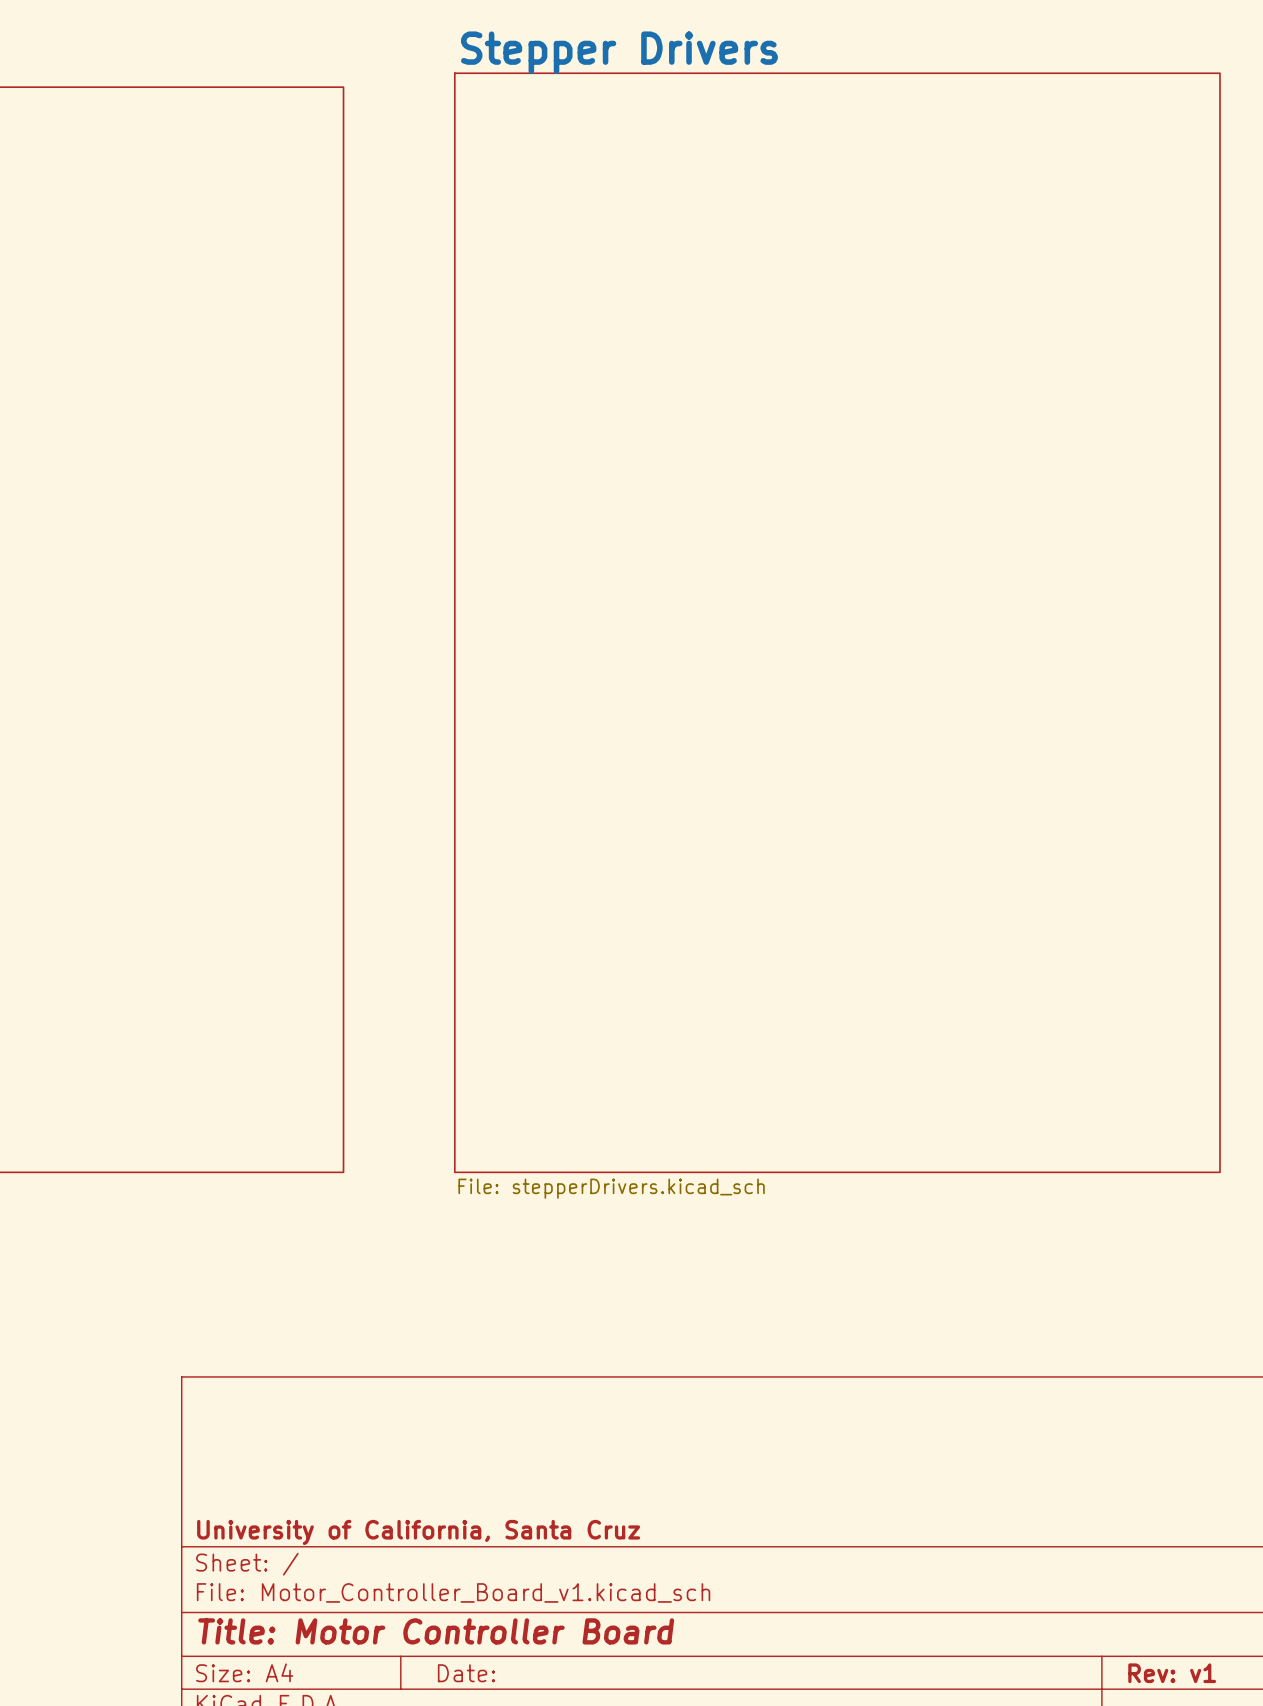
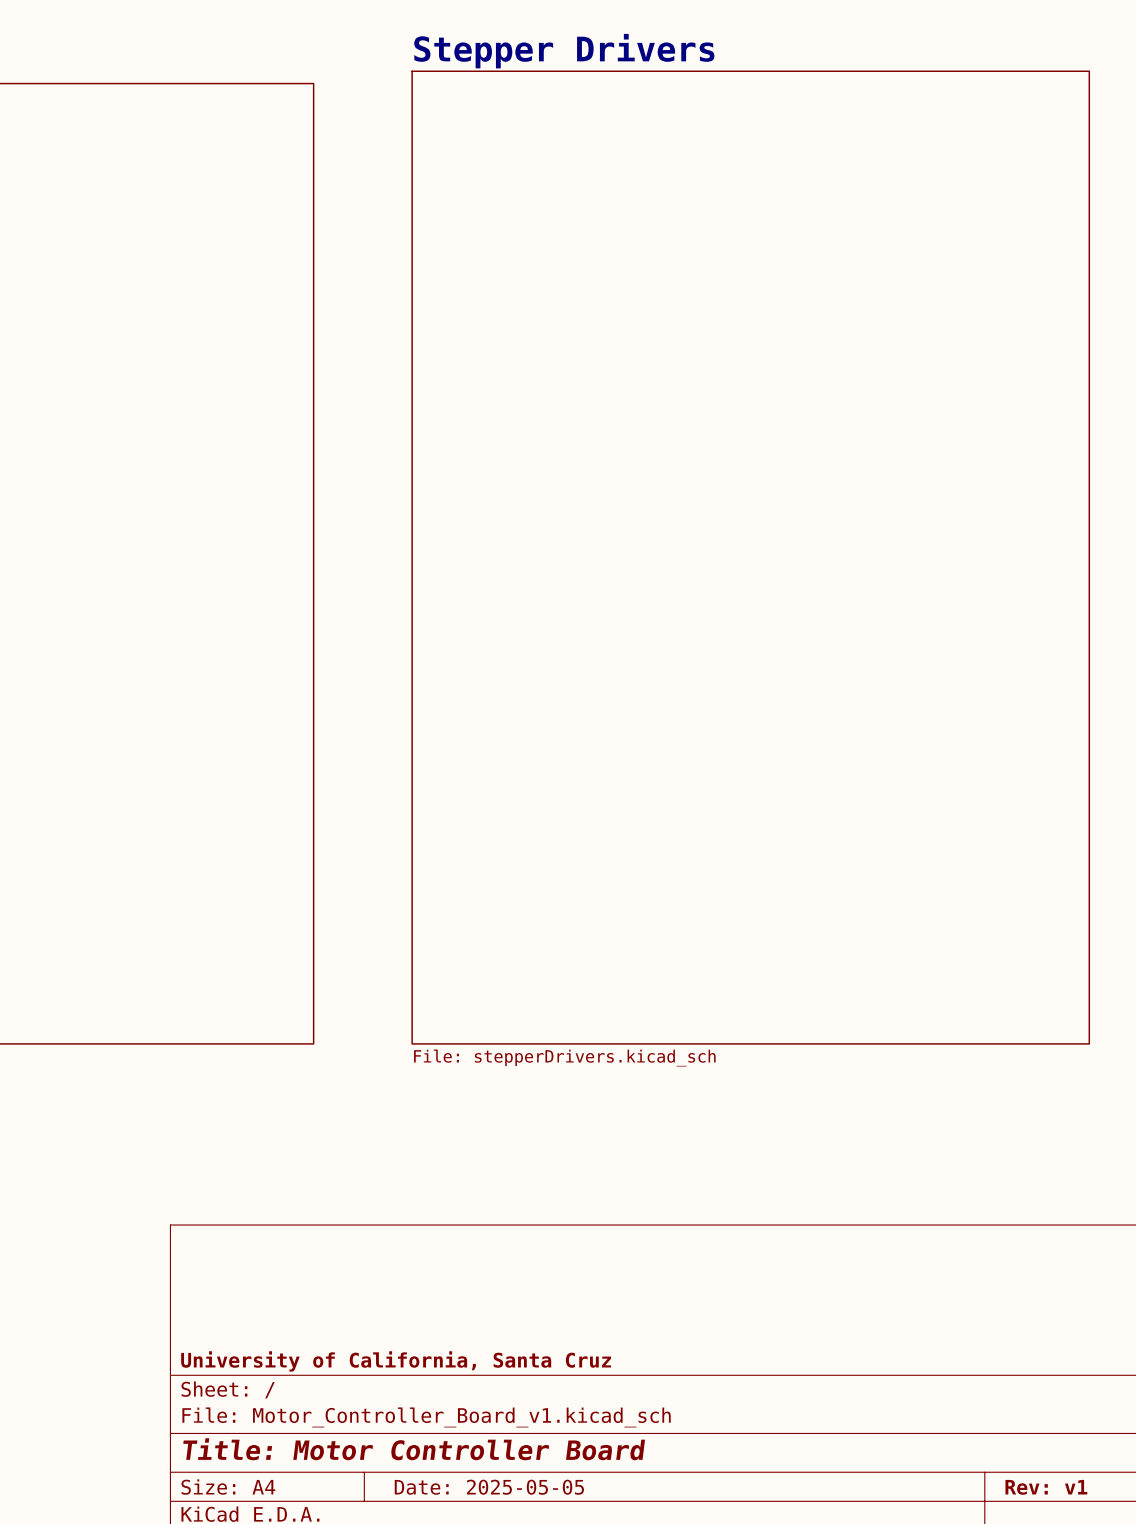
title block: Date: (466, 1673) -> Date: 2025-05-05 (489, 1487)

